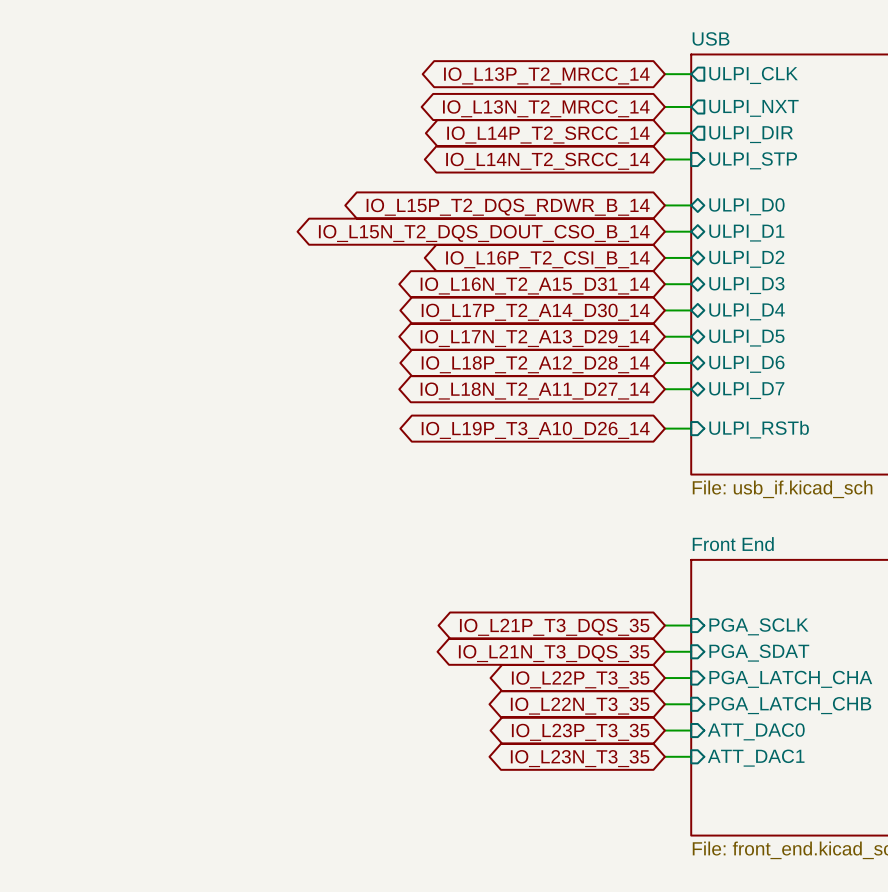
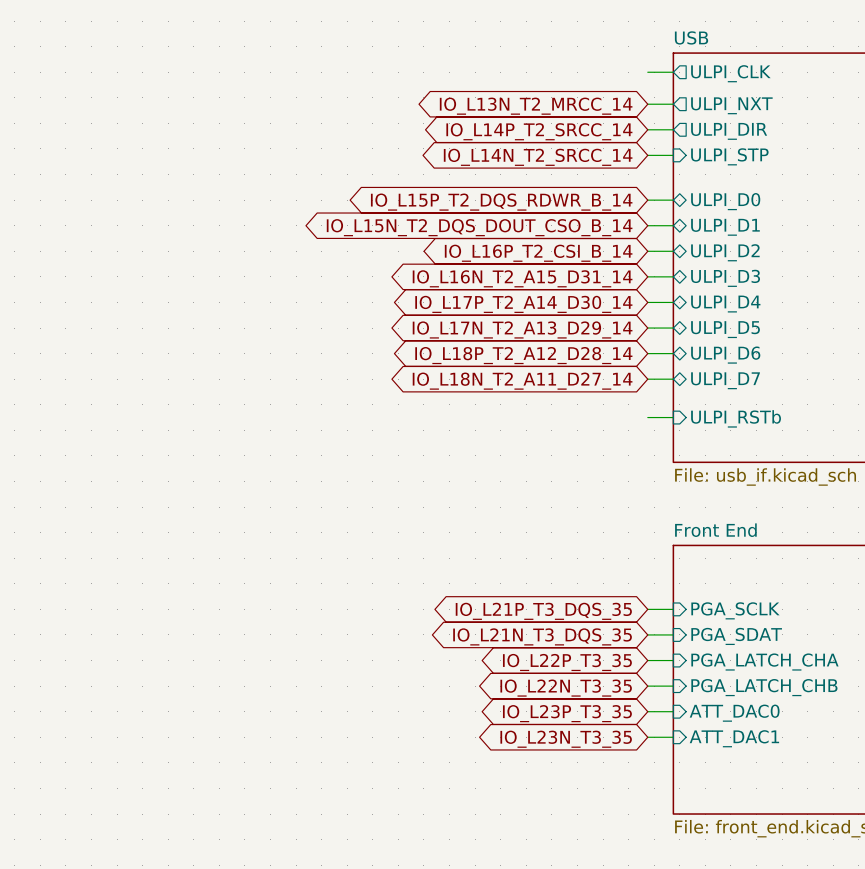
global label: IO_L13P_T2_MRCC_14 (546, 75) -> none
global label: IO_L19P_T3_A10_D26_14 (535, 430) -> none

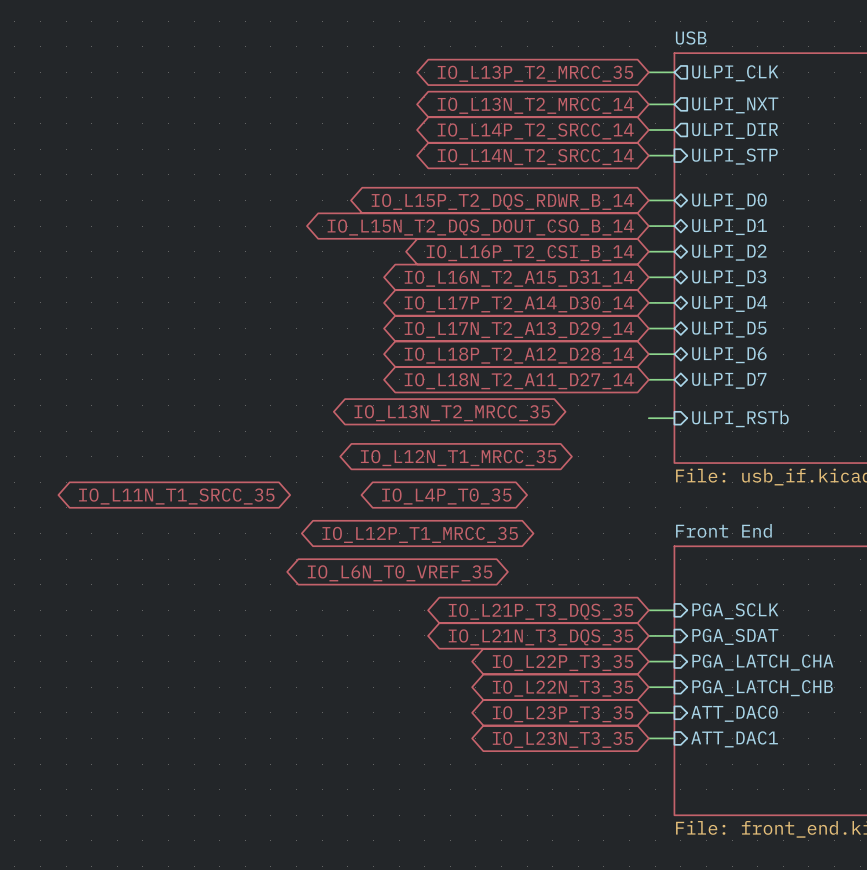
global label: none -> IO_L13P_T2_MRCC_35 (535, 73)
global label: none -> IO_L13N_T2_MRCC_35 (452, 413)
global label: none -> IO_L12N_T1_MRCC_35 (458, 458)
global label: none -> IO_L11N_T1_SRCC_35 (176, 496)
global label: none -> IO_L4P_T0_35 (446, 496)
global label: none -> IO_L12P_T1_MRCC_35 (420, 534)
global label: none -> IO_L6N_T0_VREF_35 (400, 573)

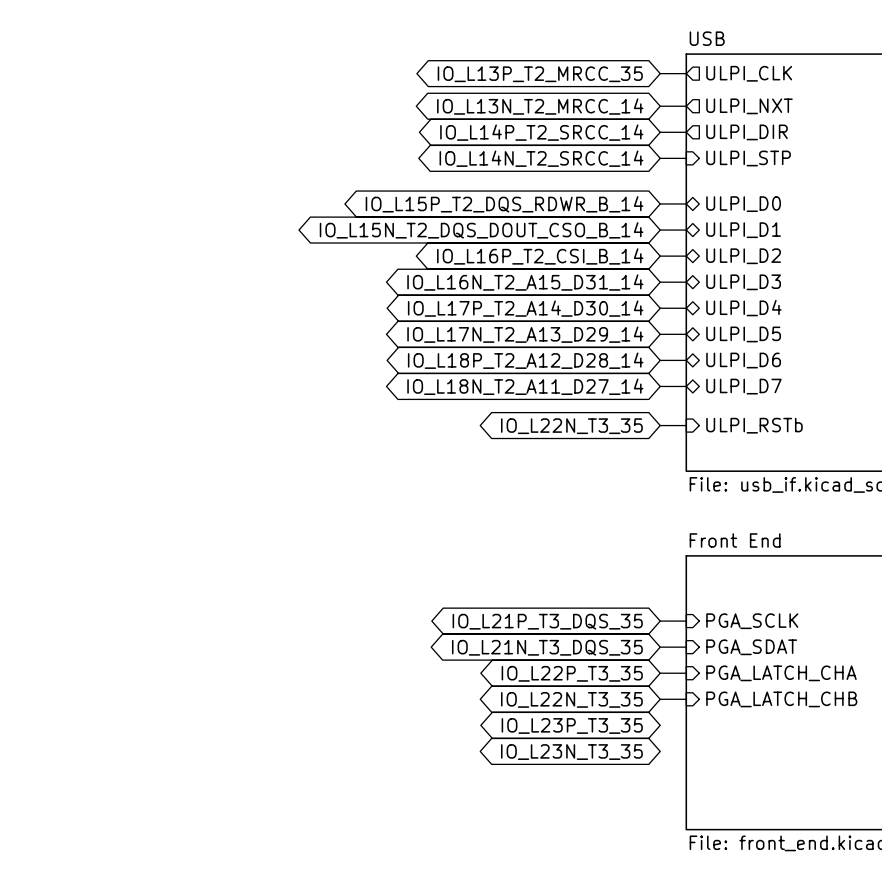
global label: IO_L13N_T2_MRCC_35 (452, 413) -> IO_L22N_T3_35 (571, 426)
global label: IO_L12N_T1_MRCC_35 (458, 458) -> none
global label: IO_L11N_T1_SRCC_35 (176, 496) -> none
global label: IO_L4P_T0_35 (446, 496) -> none
global label: IO_L12P_T1_MRCC_35 (420, 534) -> none
global label: IO_L6N_T0_VREF_35 (400, 573) -> none
wire: (648, 712) (674, 712) -> none
sheet pin: ATT_DAC0 (734, 713) -> none
wire: (648, 738) (674, 738) -> none
sheet pin: ATT_DAC1 (734, 739) -> none

